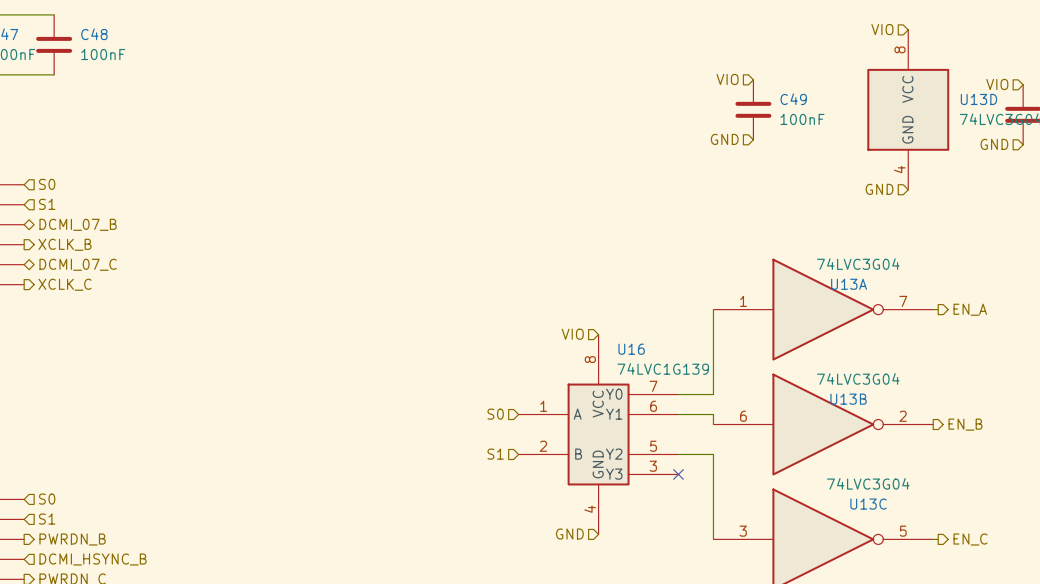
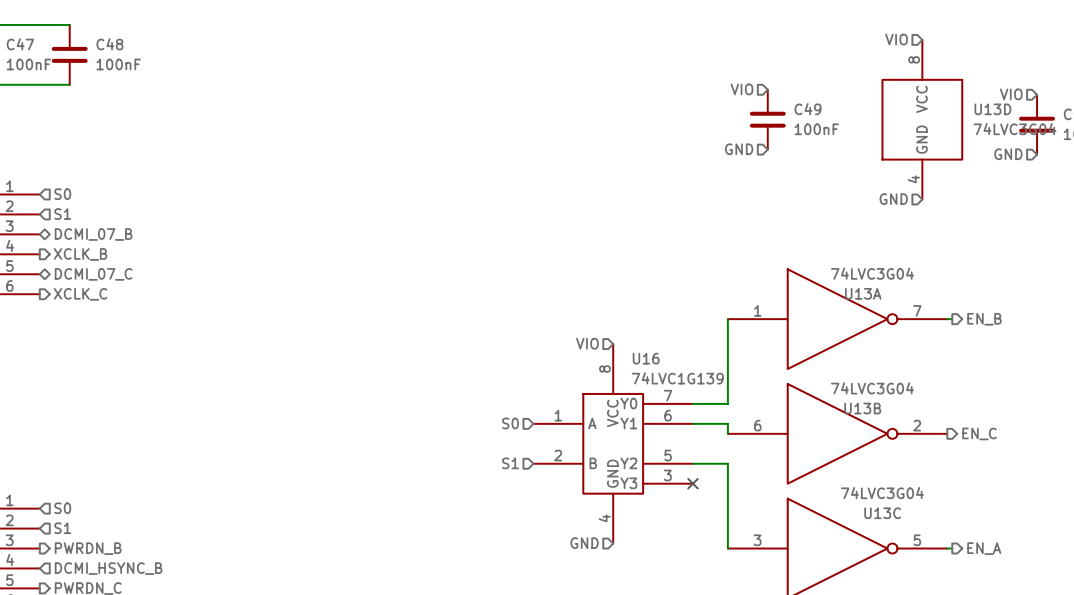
hierarchical label: EN_A (970, 309) -> EN_B (984, 319)
hierarchical label: EN_B (965, 424) -> EN_C (979, 433)
hierarchical label: EN_C (970, 539) -> EN_A (984, 548)

